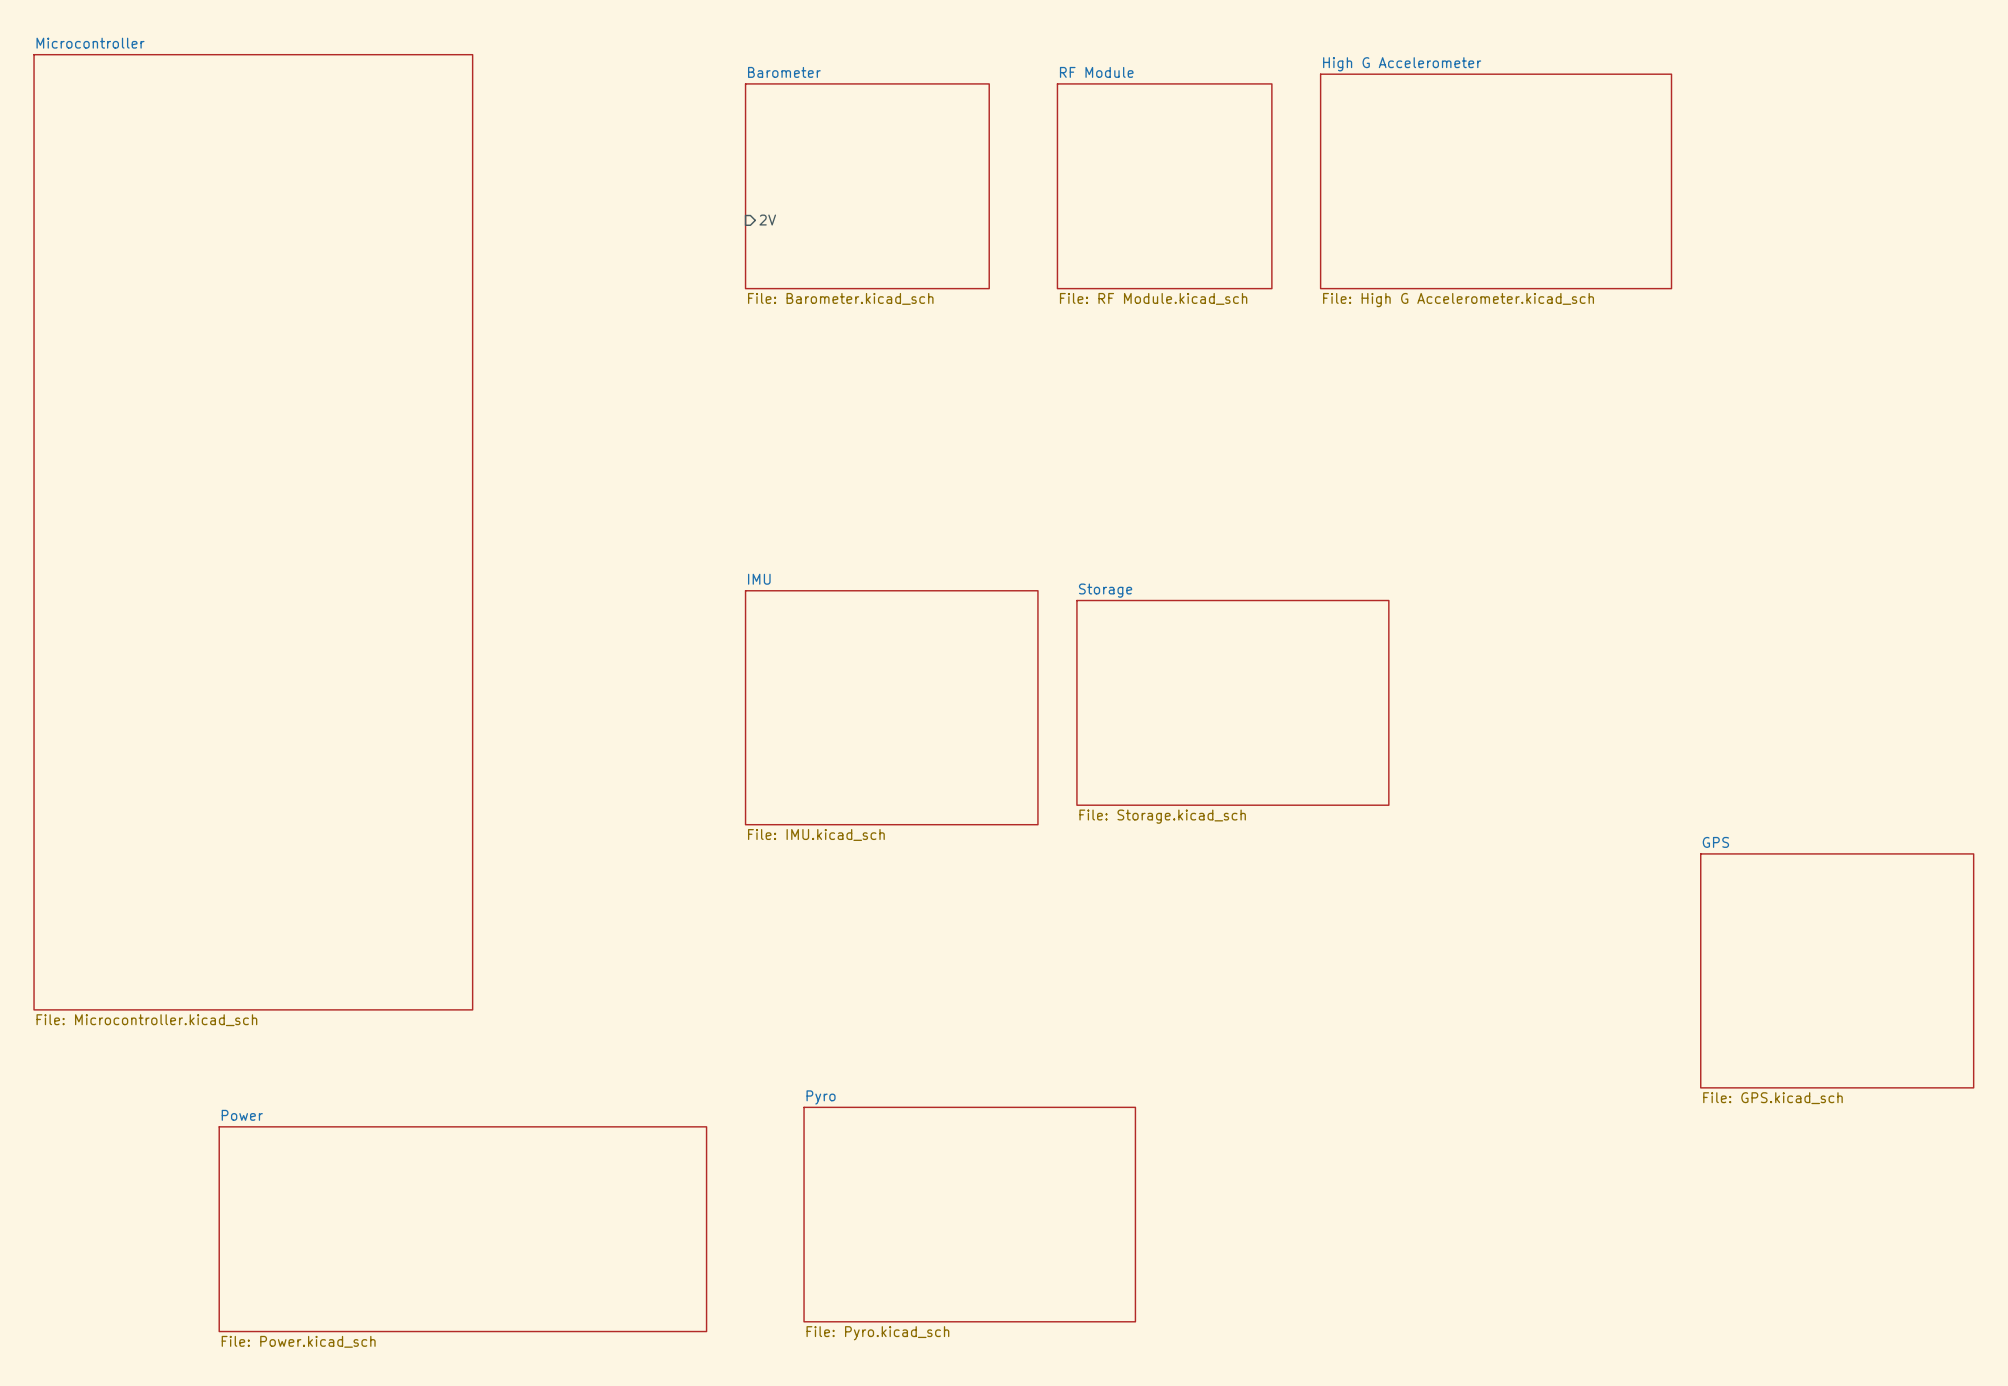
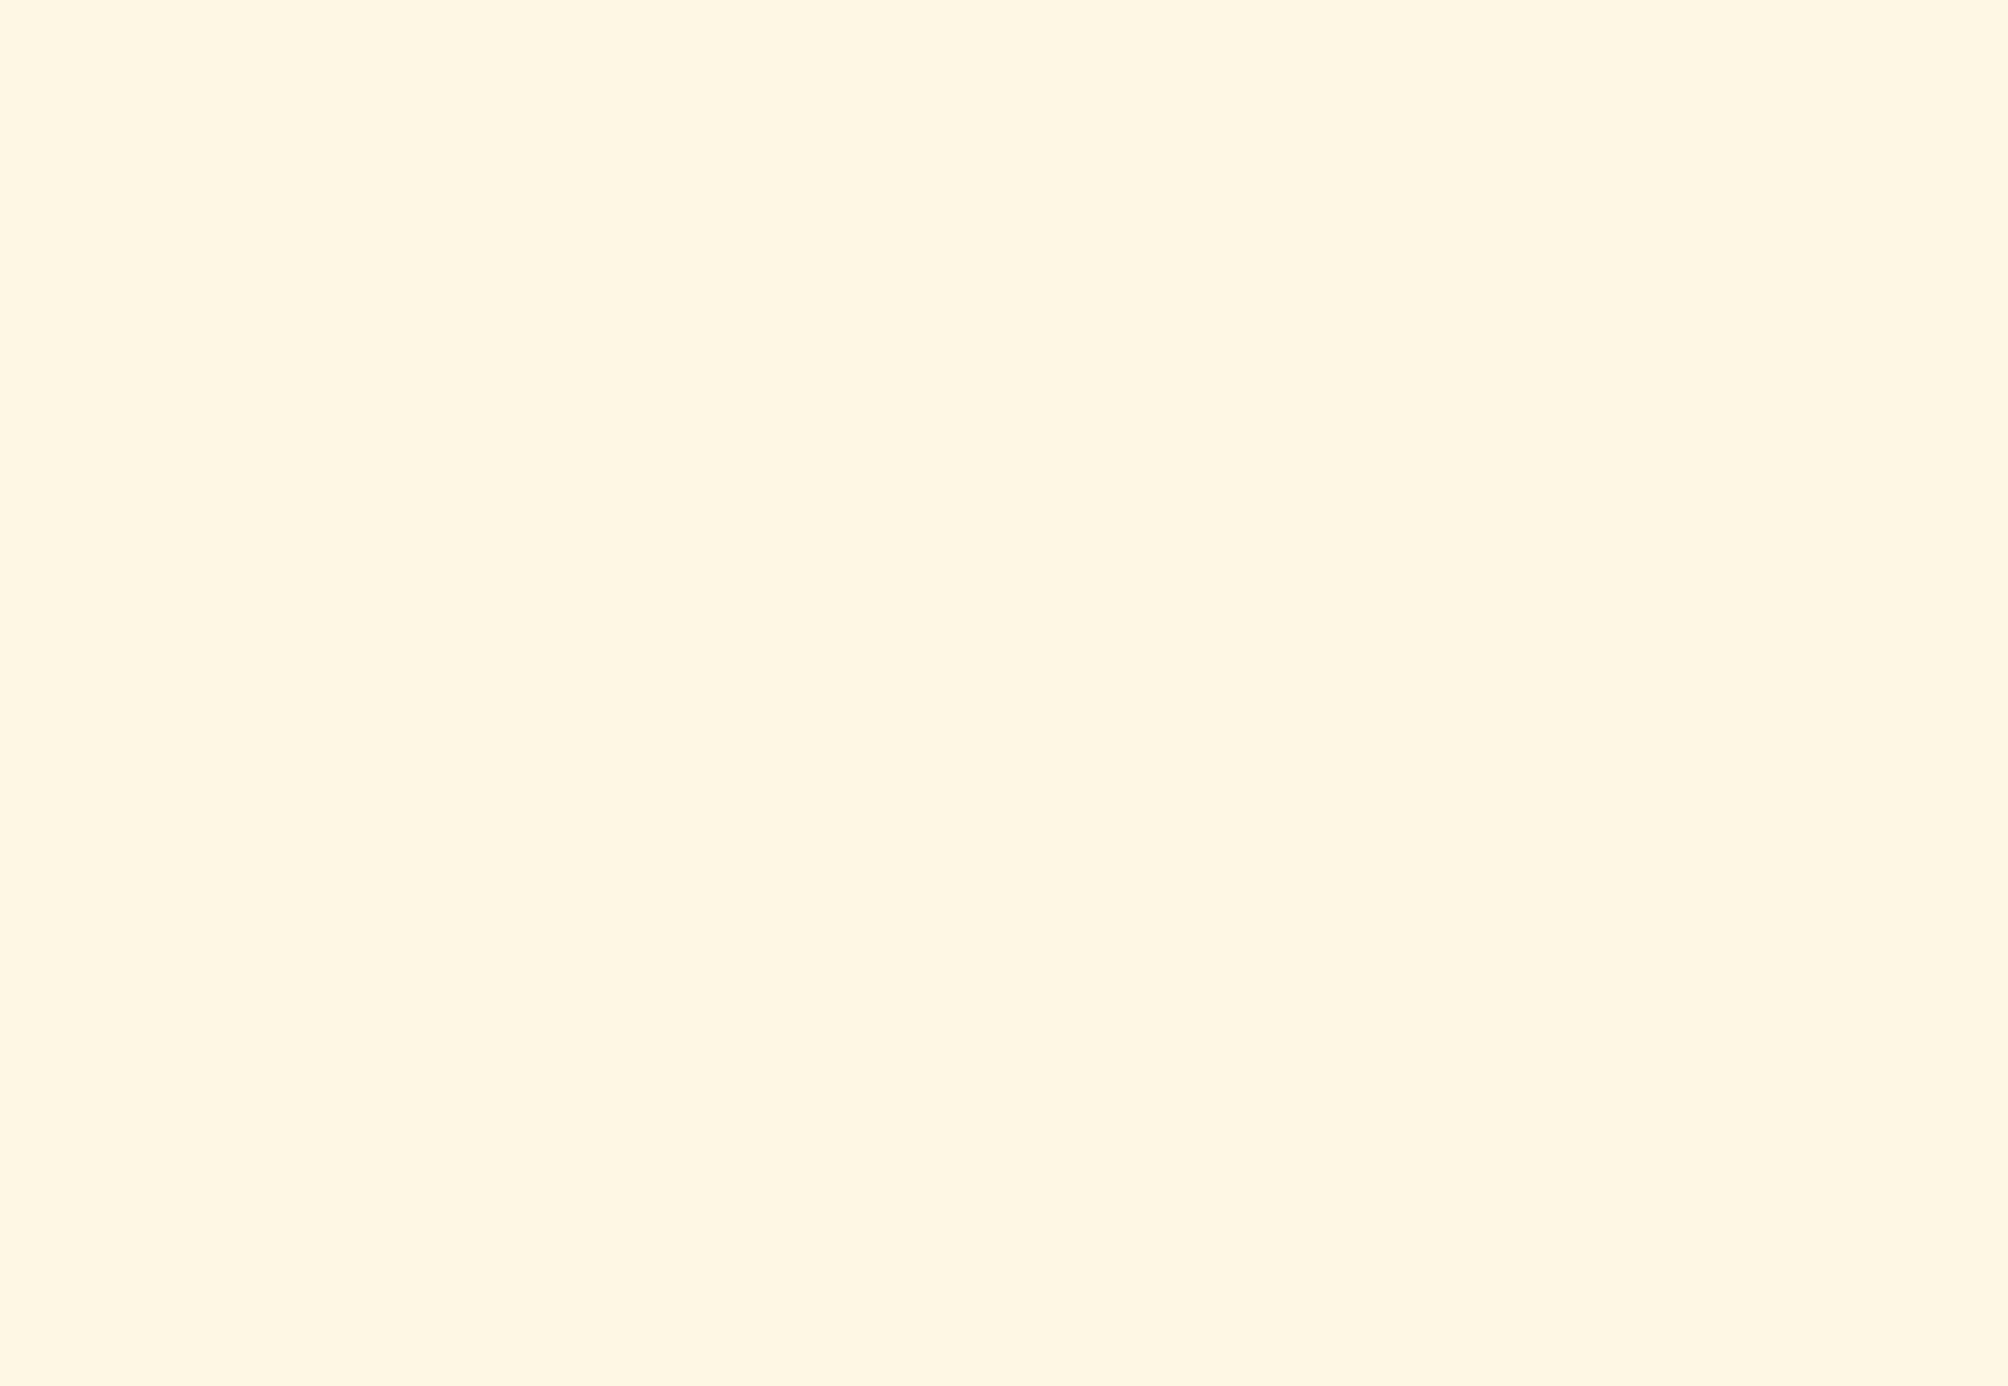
sheet High G Accelerometer: File: High G Accelerometer.kicad_sch (1496, 181) -> none
sheet Barometer: File: Barometer.kicad_sch (867, 186) -> none
sheet RF Module: File: RF Module.kicad_sch (1164, 186) -> none
sheet pin: 2V (767, 220) -> none
sheet Microcontroller: File: Microcontroller.kicad_sch (253, 532) -> none
sheet Storage: File: Storage.kicad_sch (1232, 702) -> none
sheet IMU: File: IMU.kicad_sch (891, 707) -> none
sheet GPS: File: GPS.kicad_sch (1837, 970) -> none
sheet Pyro: File: Pyro.kicad_sch (969, 1214) -> none
sheet Power: File: Power.kicad_sch (462, 1229) -> none

